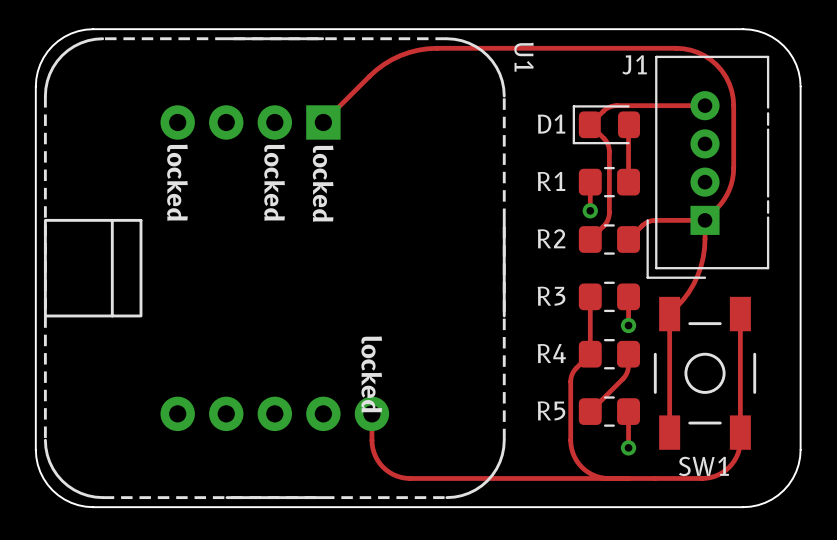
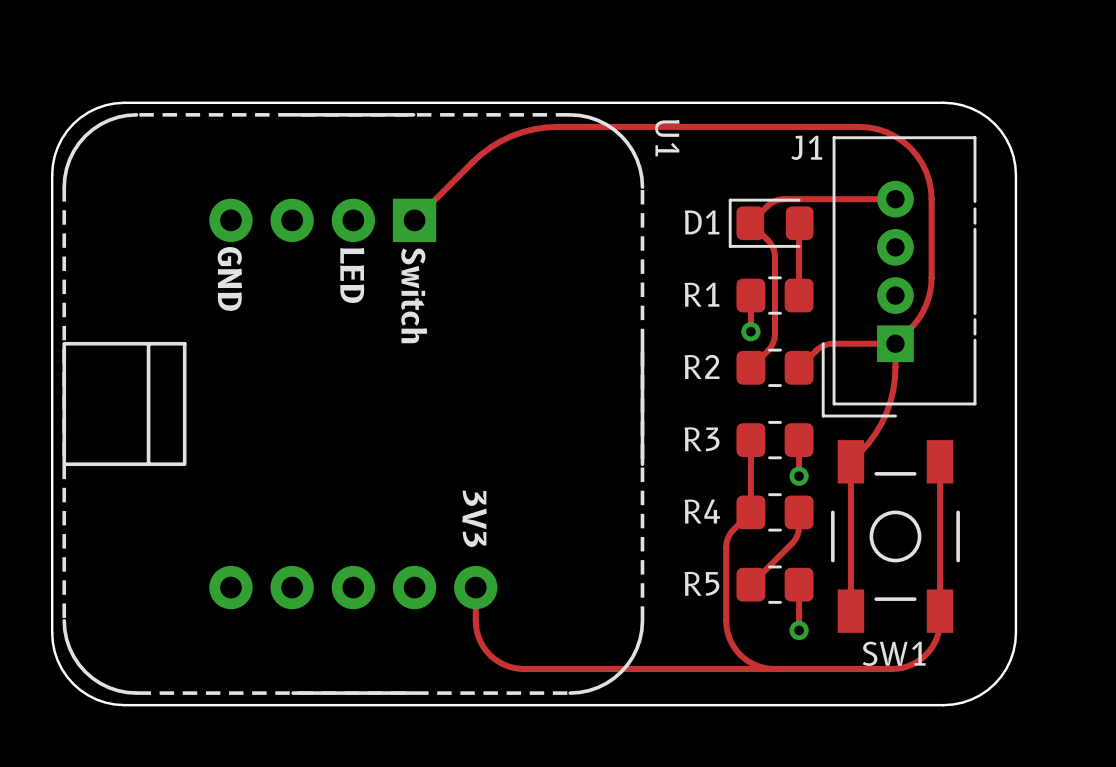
text: locked (177, 182) -> GND (229, 278)
text: locked (274, 182) -> LED (352, 275)
text: locked (323, 183) -> Switch (414, 295)
text: locked (371, 374) -> 3V3 (474, 518)

